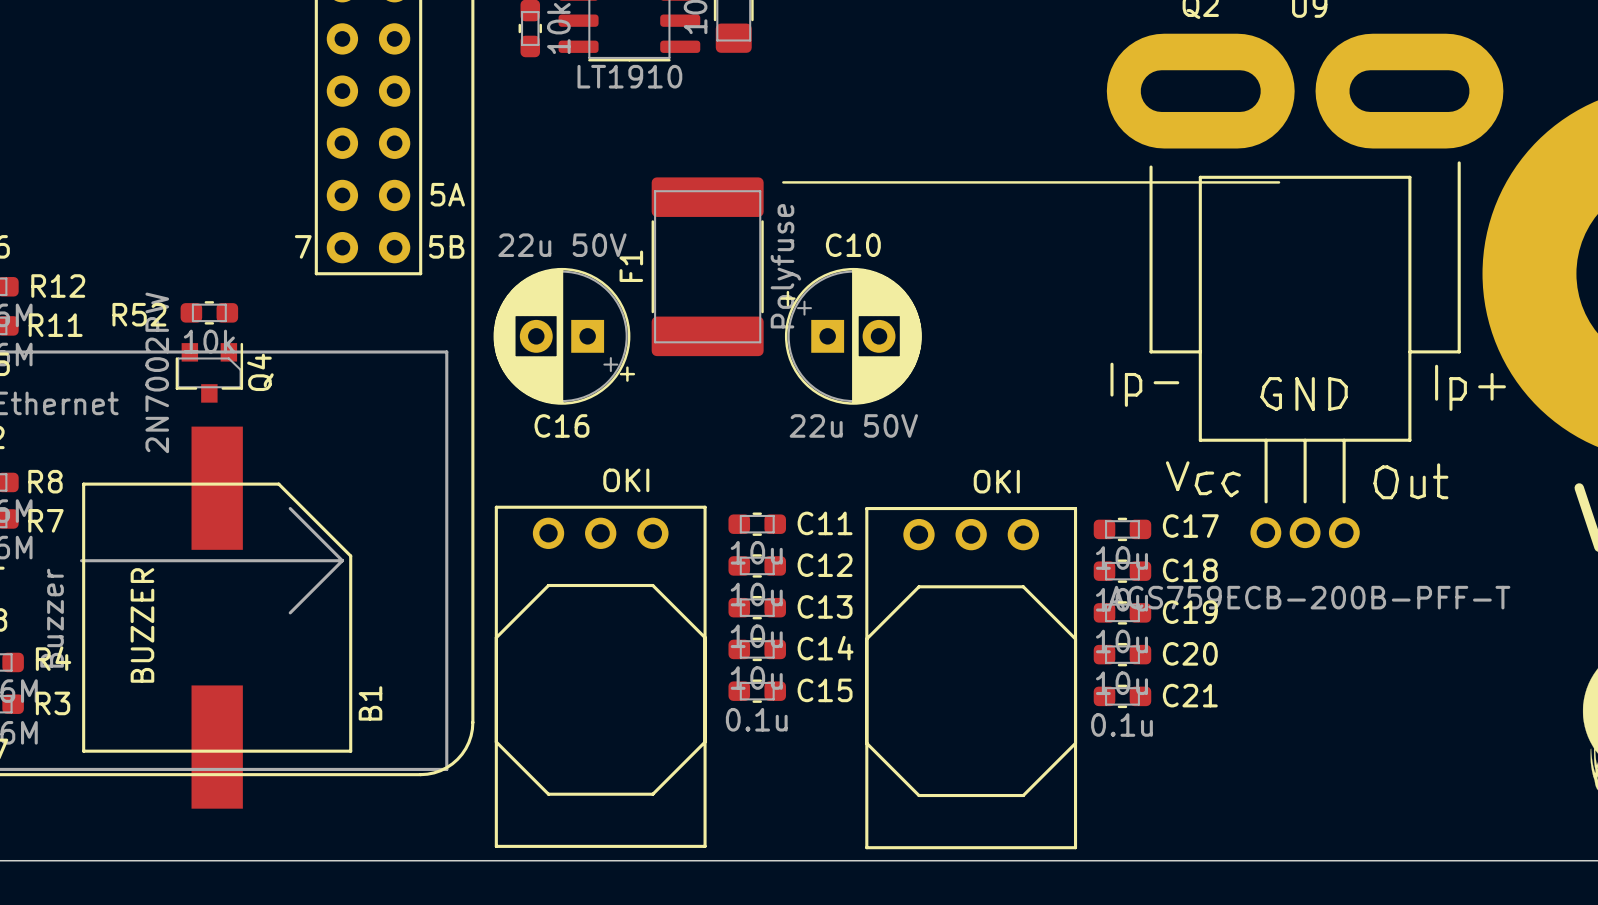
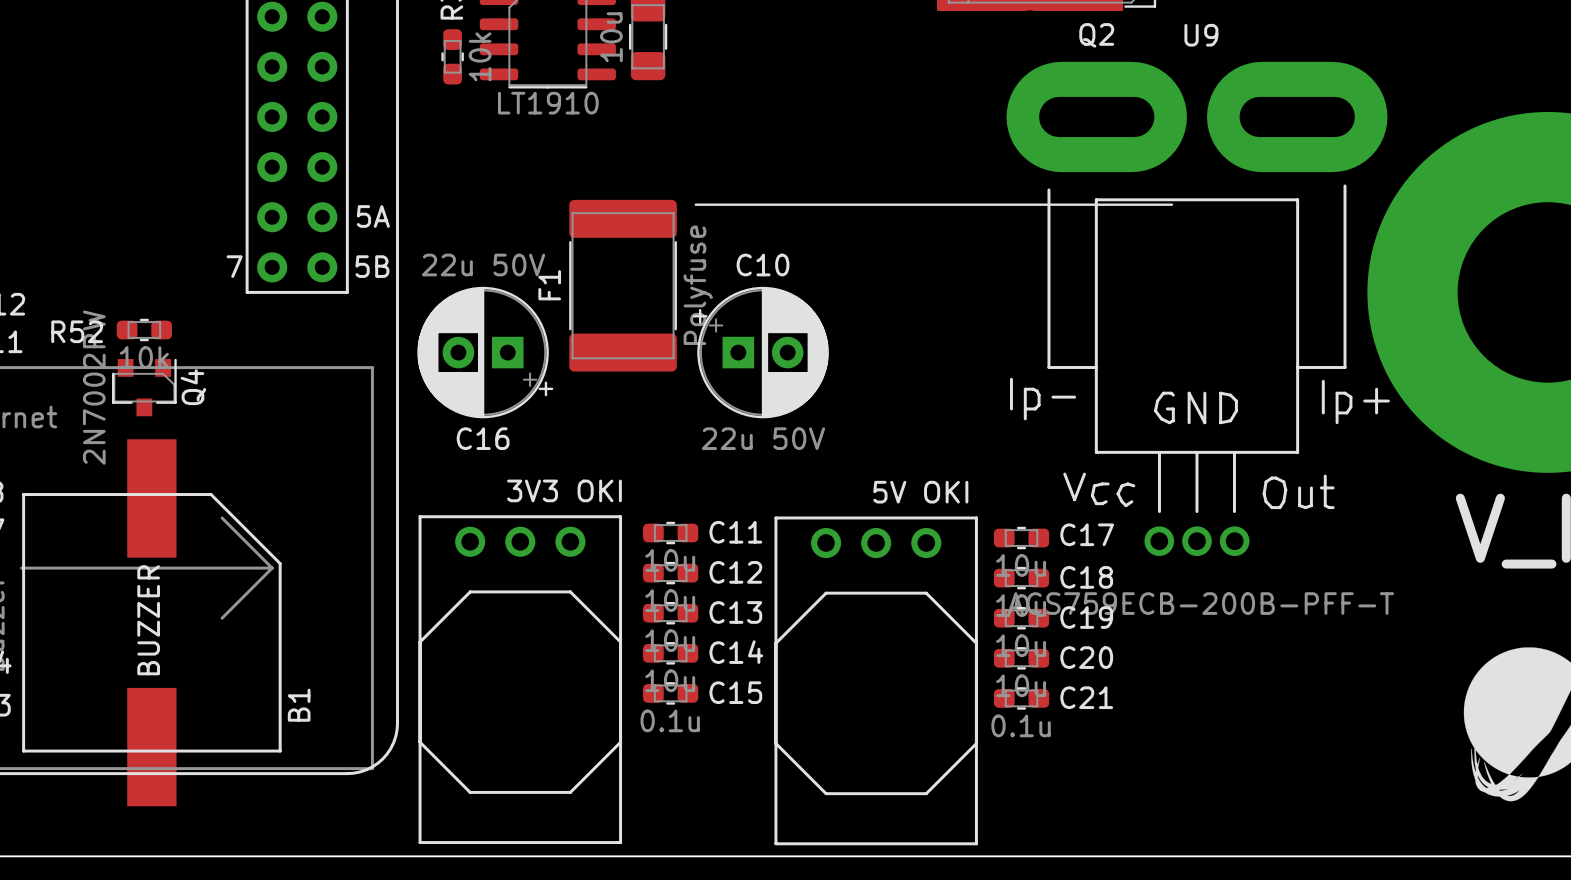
part value: OKI (626, 480) -> 3V3 OKI (564, 490)
part value: OKI (996, 481) -> 5V OKI (920, 492)
B1 text position: BUZZER (142, 625) -> BUZZER (148, 620)

